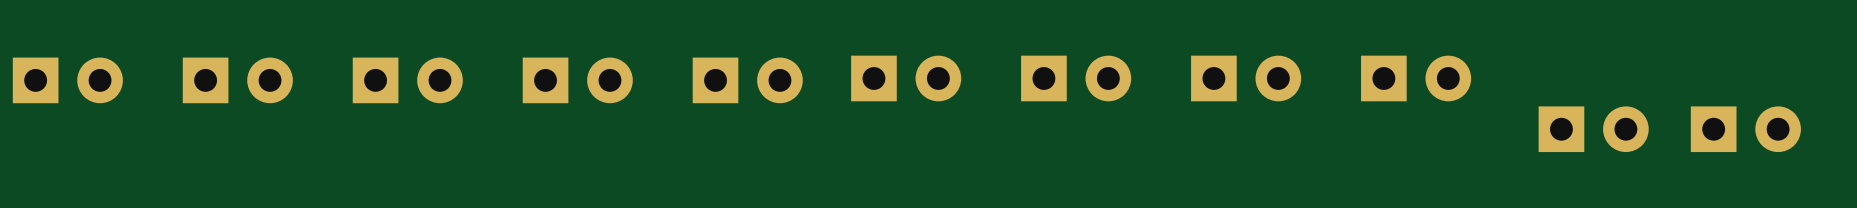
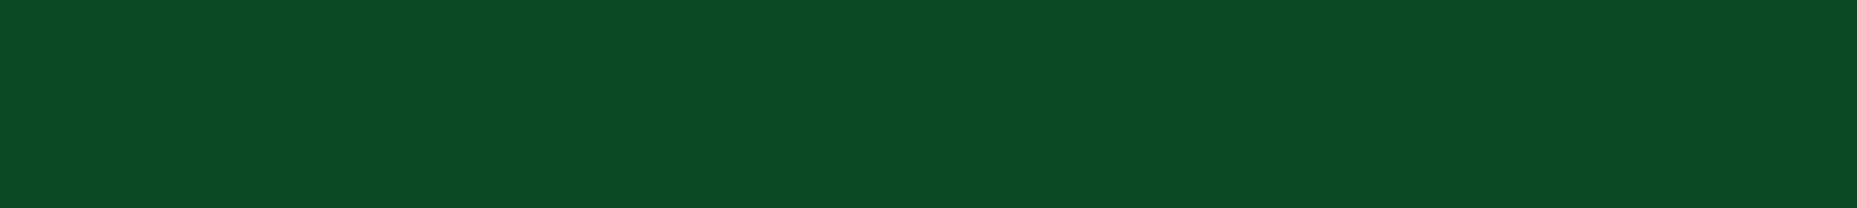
part: (906, 78) -> none
part: (1076, 78) -> none
part: (1246, 78) -> none
part: (1416, 78) -> none
part: (67, 80) -> none
part: (237, 80) -> none
part: (407, 80) -> none
part: (577, 80) -> none
part: (747, 80) -> none
part: (1593, 129) -> none
part: (1745, 129) -> none

